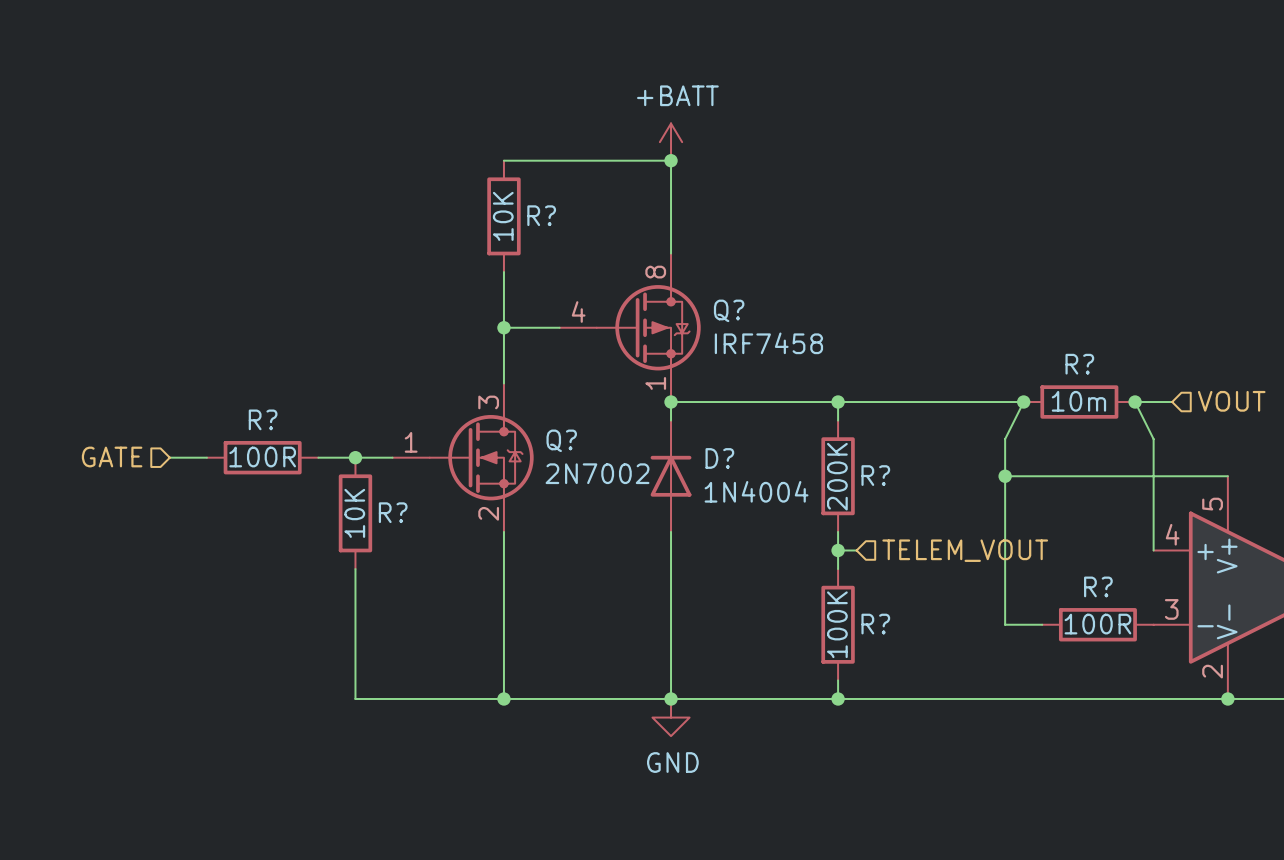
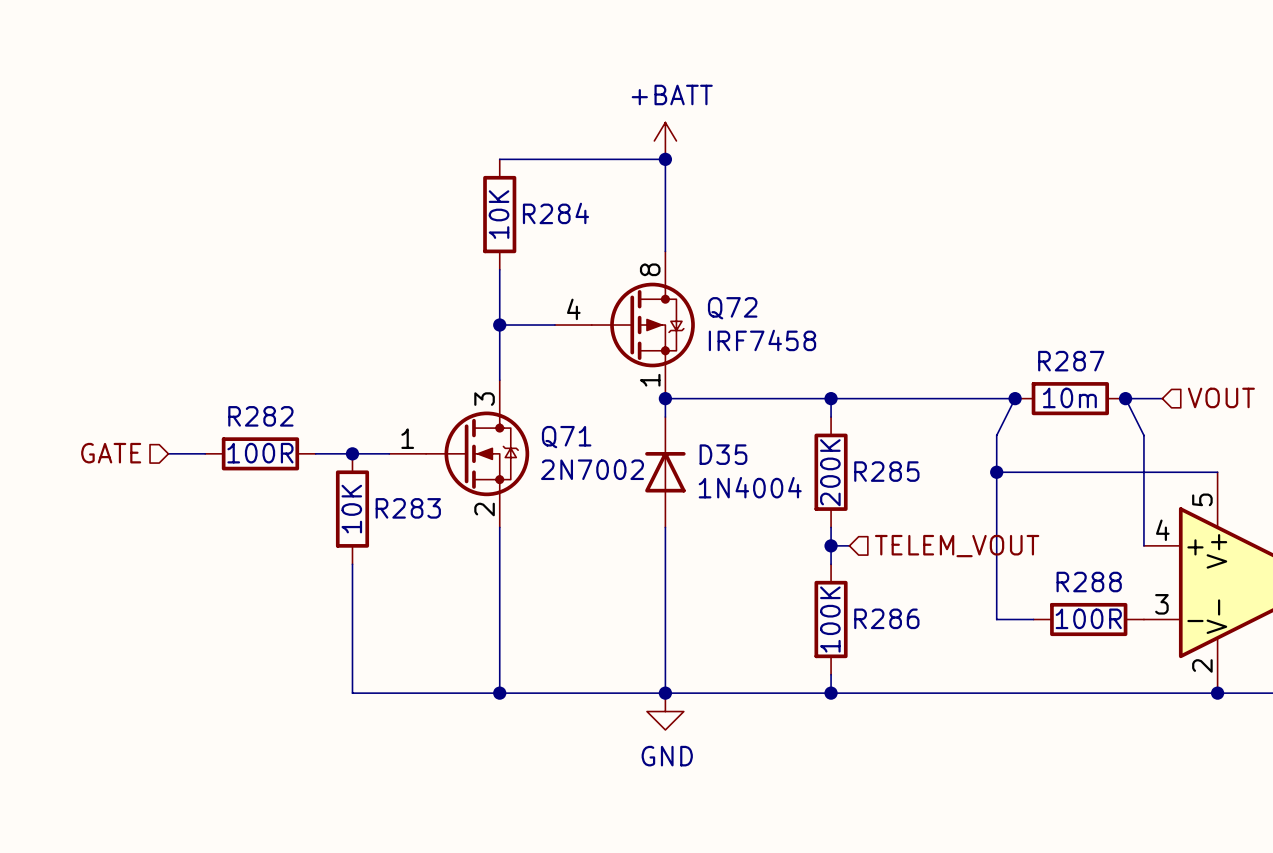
R? name: R? (541, 215) -> R284 (555, 213)
Q? name: Q? (729, 310) -> Q72 (732, 308)
R? name: R? (1079, 364) -> R287 (1071, 361)
R? name: R? (263, 419) -> R282 (260, 416)
Q? name: Q? (561, 440) -> Q71 (566, 437)
D? name: D? (719, 458) -> D35 (723, 454)
R? name: R? (875, 475) -> R285 (886, 471)
R? name: R? (393, 512) -> R283 (408, 508)
R? name: R? (1098, 586) -> R288 (1089, 582)
R? name: R? (875, 624) -> R286 (886, 618)

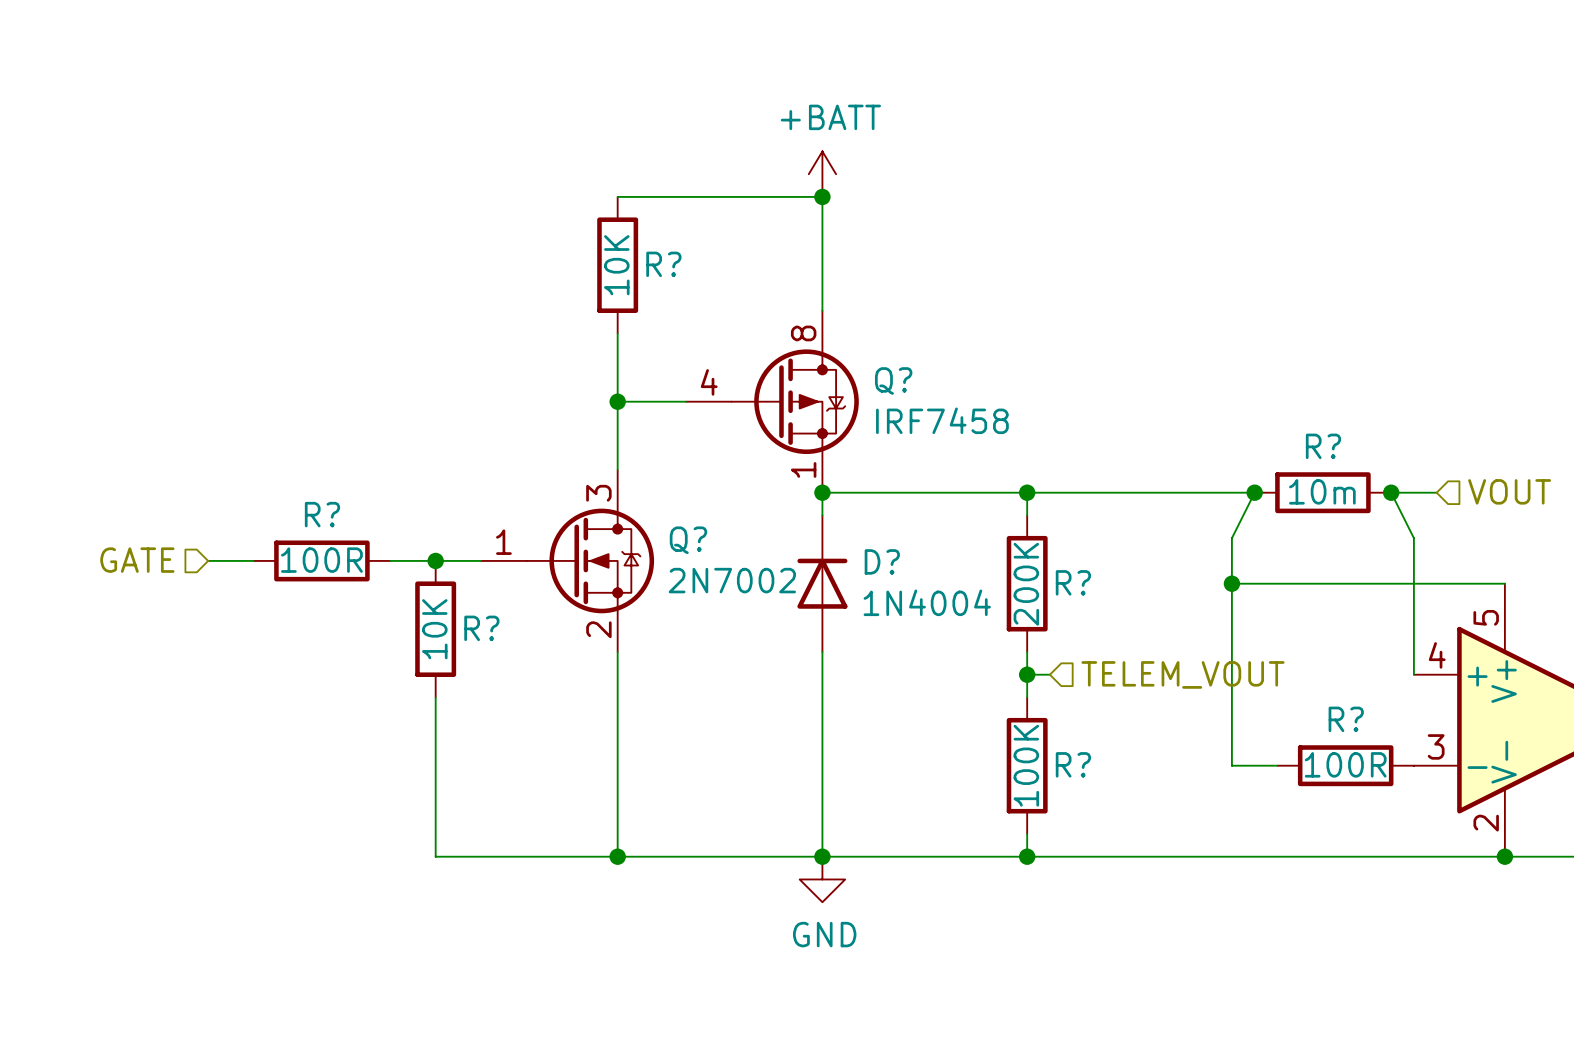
R284 name: R284 (555, 213) -> R? (663, 264)
Q72 name: Q72 (732, 308) -> Q? (893, 381)
R287 name: R287 (1071, 361) -> R? (1323, 446)
R282 name: R282 (260, 416) -> R? (322, 514)
Q71 name: Q71 (566, 437) -> Q? (688, 540)
D35 name: D35 (723, 454) -> D? (882, 561)
R285 name: R285 (886, 471) -> R? (1073, 582)
R283 name: R283 (408, 508) -> R? (481, 628)
R288 name: R288 (1089, 582) -> R? (1346, 719)
R286 name: R286 (886, 618) -> R? (1073, 764)

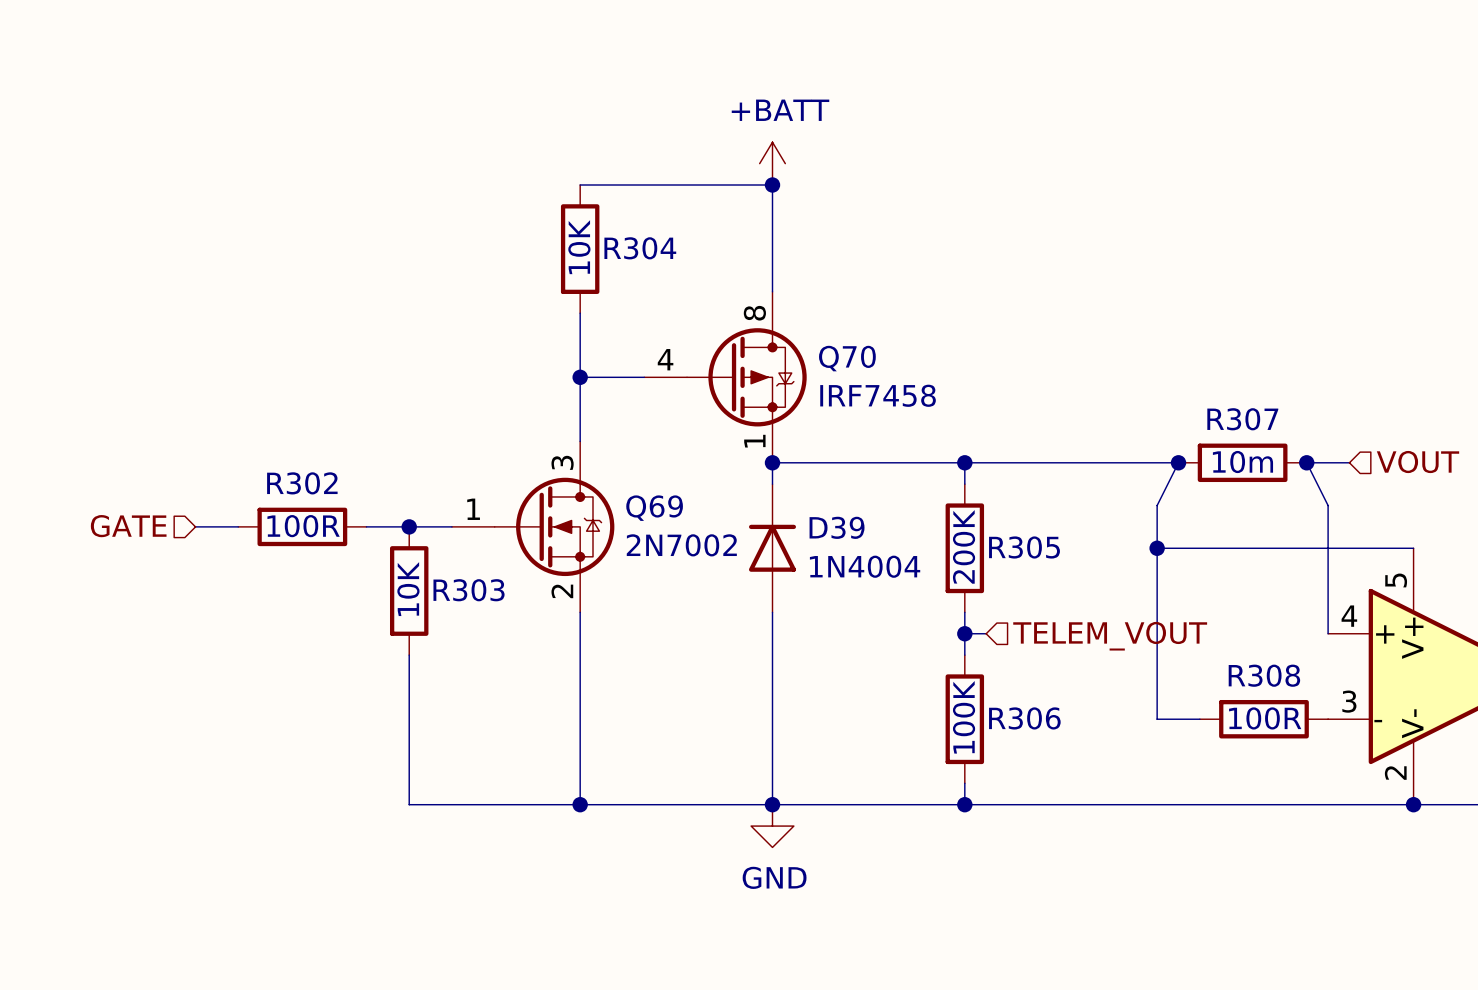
R? name: R? (663, 264) -> R304 (640, 248)
Q? name: Q? (893, 381) -> Q70 (847, 358)
R? name: R? (1323, 446) -> R307 (1242, 419)
R? name: R? (322, 514) -> R302 (302, 483)
Q? name: Q? (688, 540) -> Q69 (654, 508)
D? name: D? (882, 561) -> D39 (837, 527)
R? name: R? (1073, 582) -> R305 (1024, 547)
R? name: R? (481, 628) -> R303 (469, 590)
R? name: R? (1346, 719) -> R308 (1264, 675)
R? name: R? (1073, 764) -> R306 (1024, 718)

